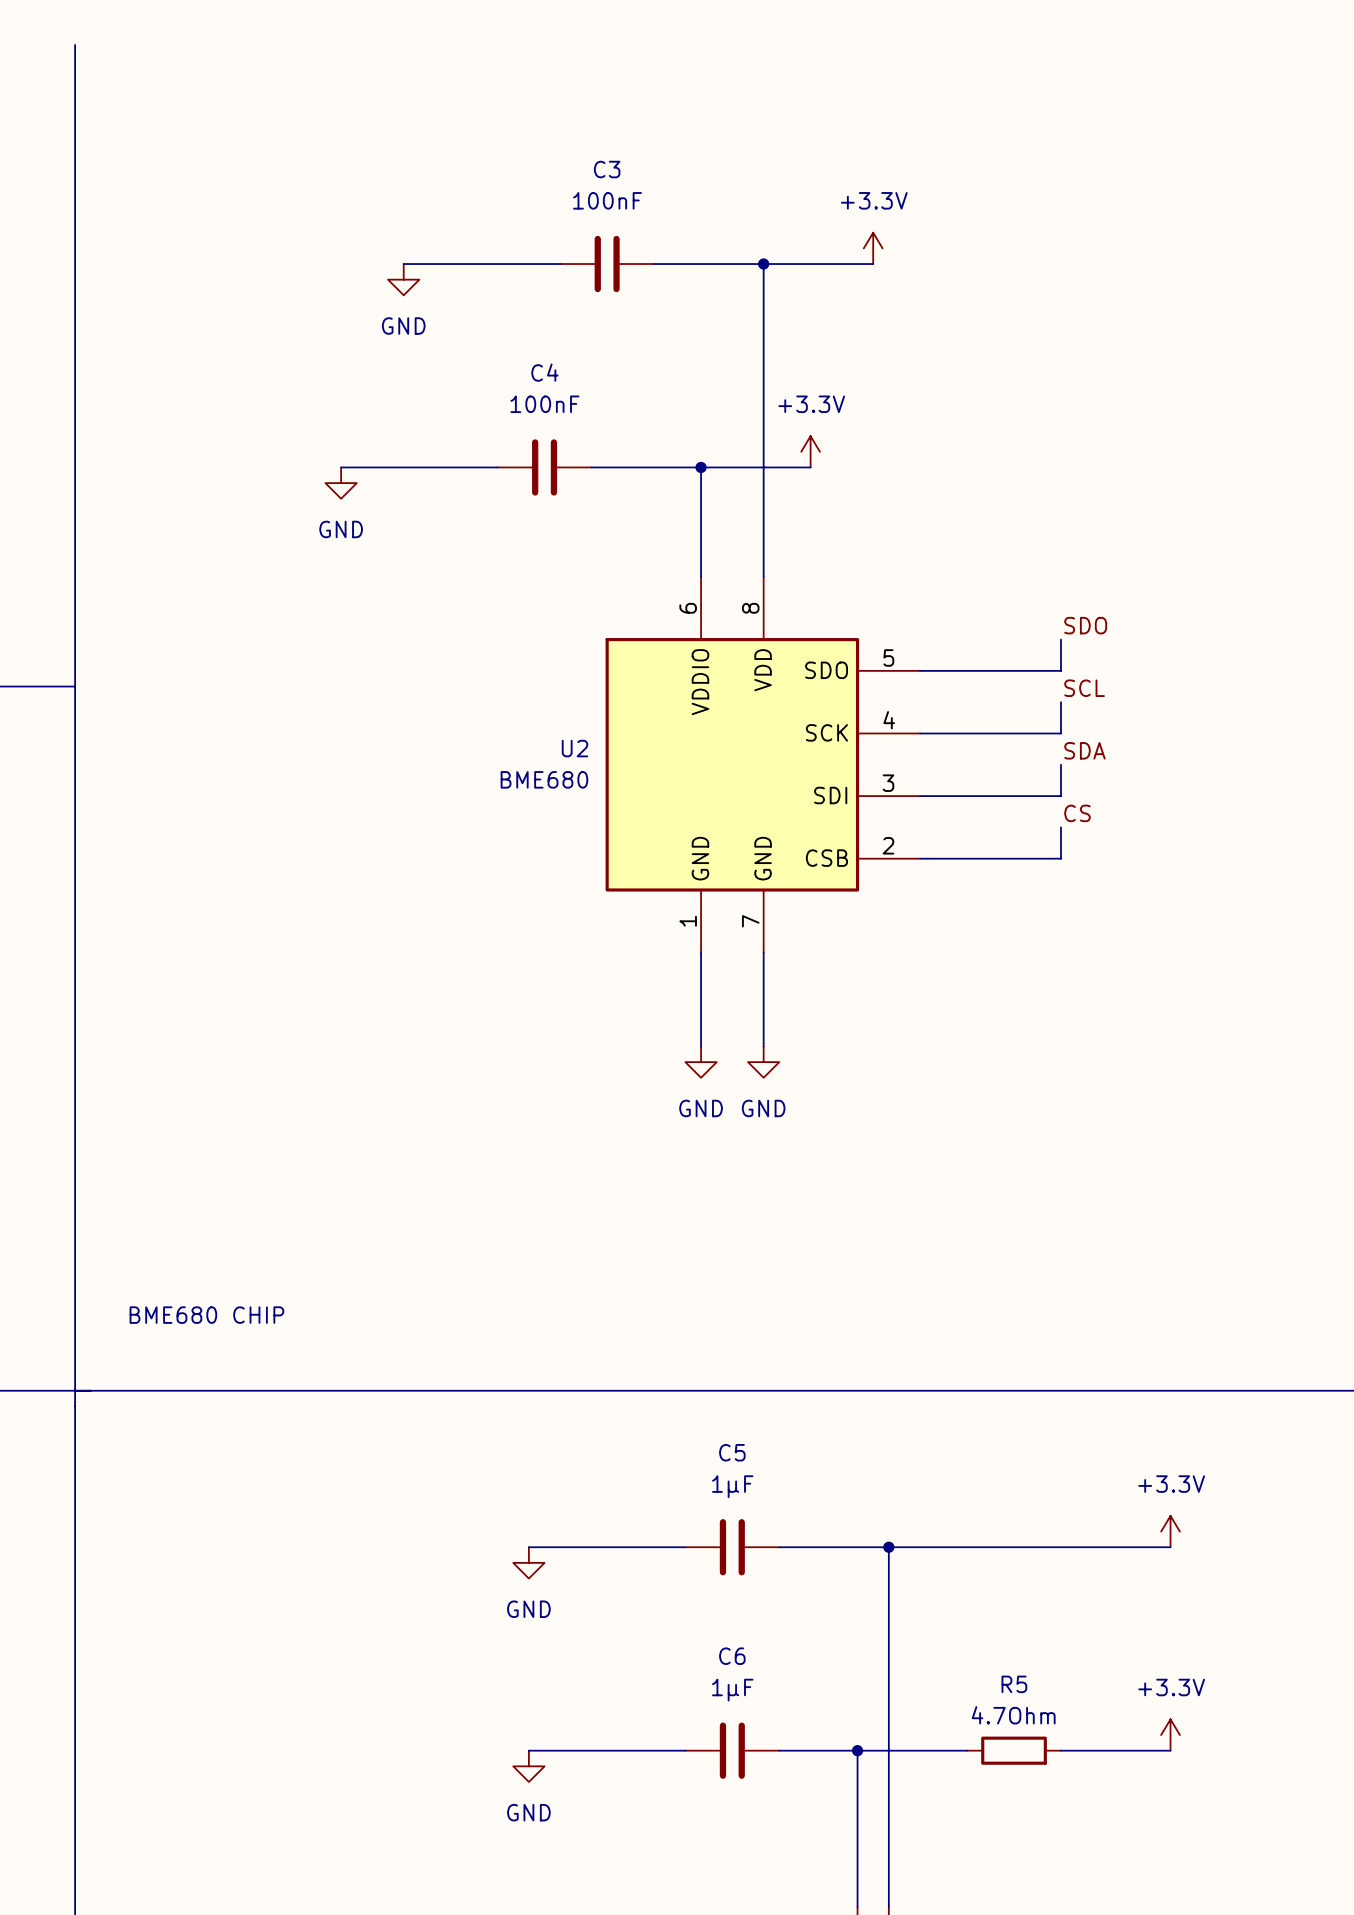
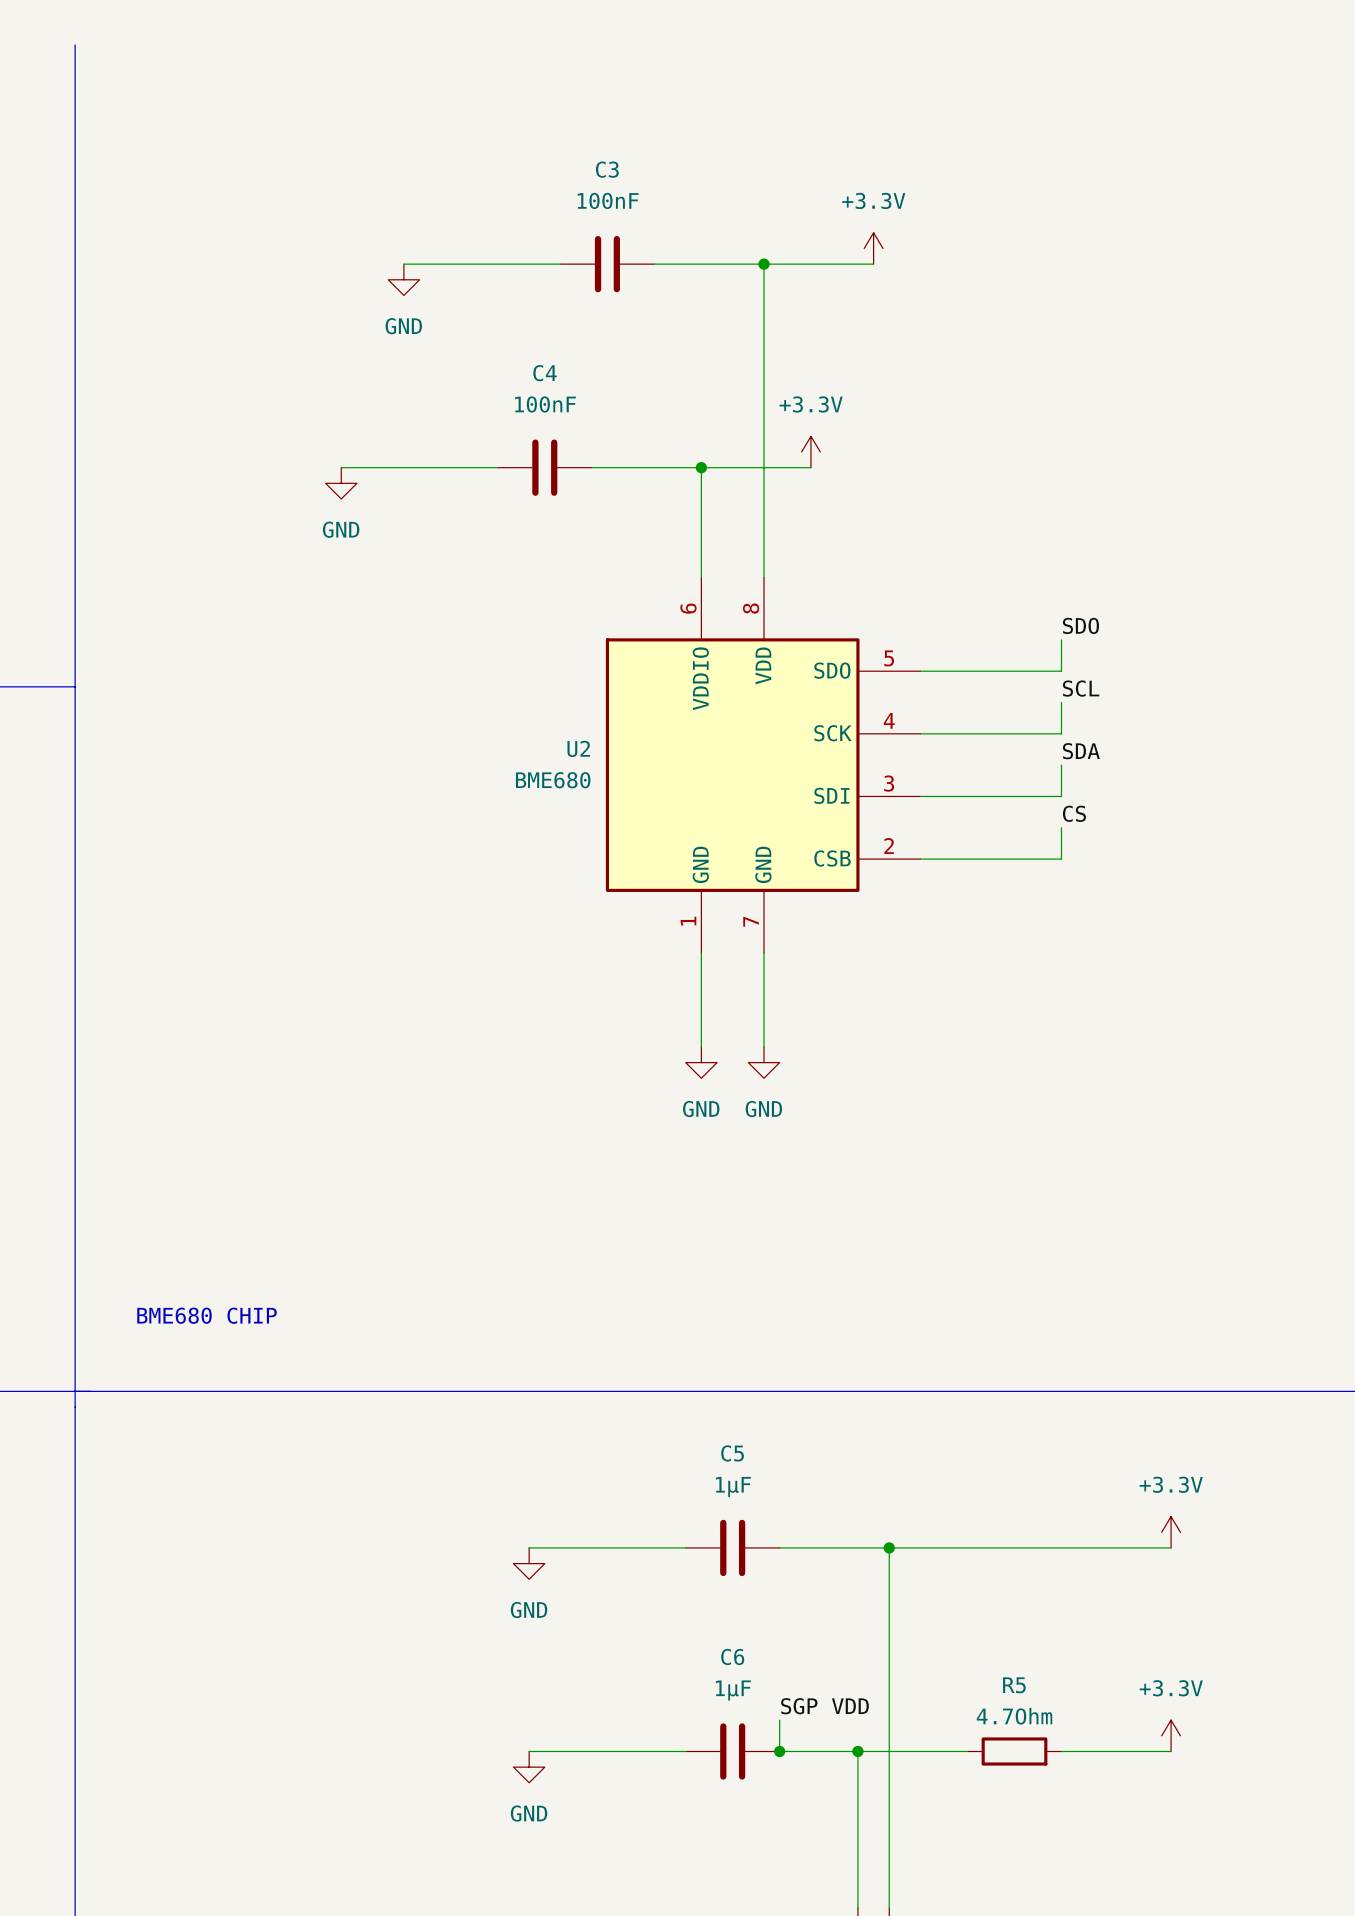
label: none -> SGP VDD (824, 1706)
wire: none -> (779, 1720) (779, 1751)
junction: none -> (779, 1751)

